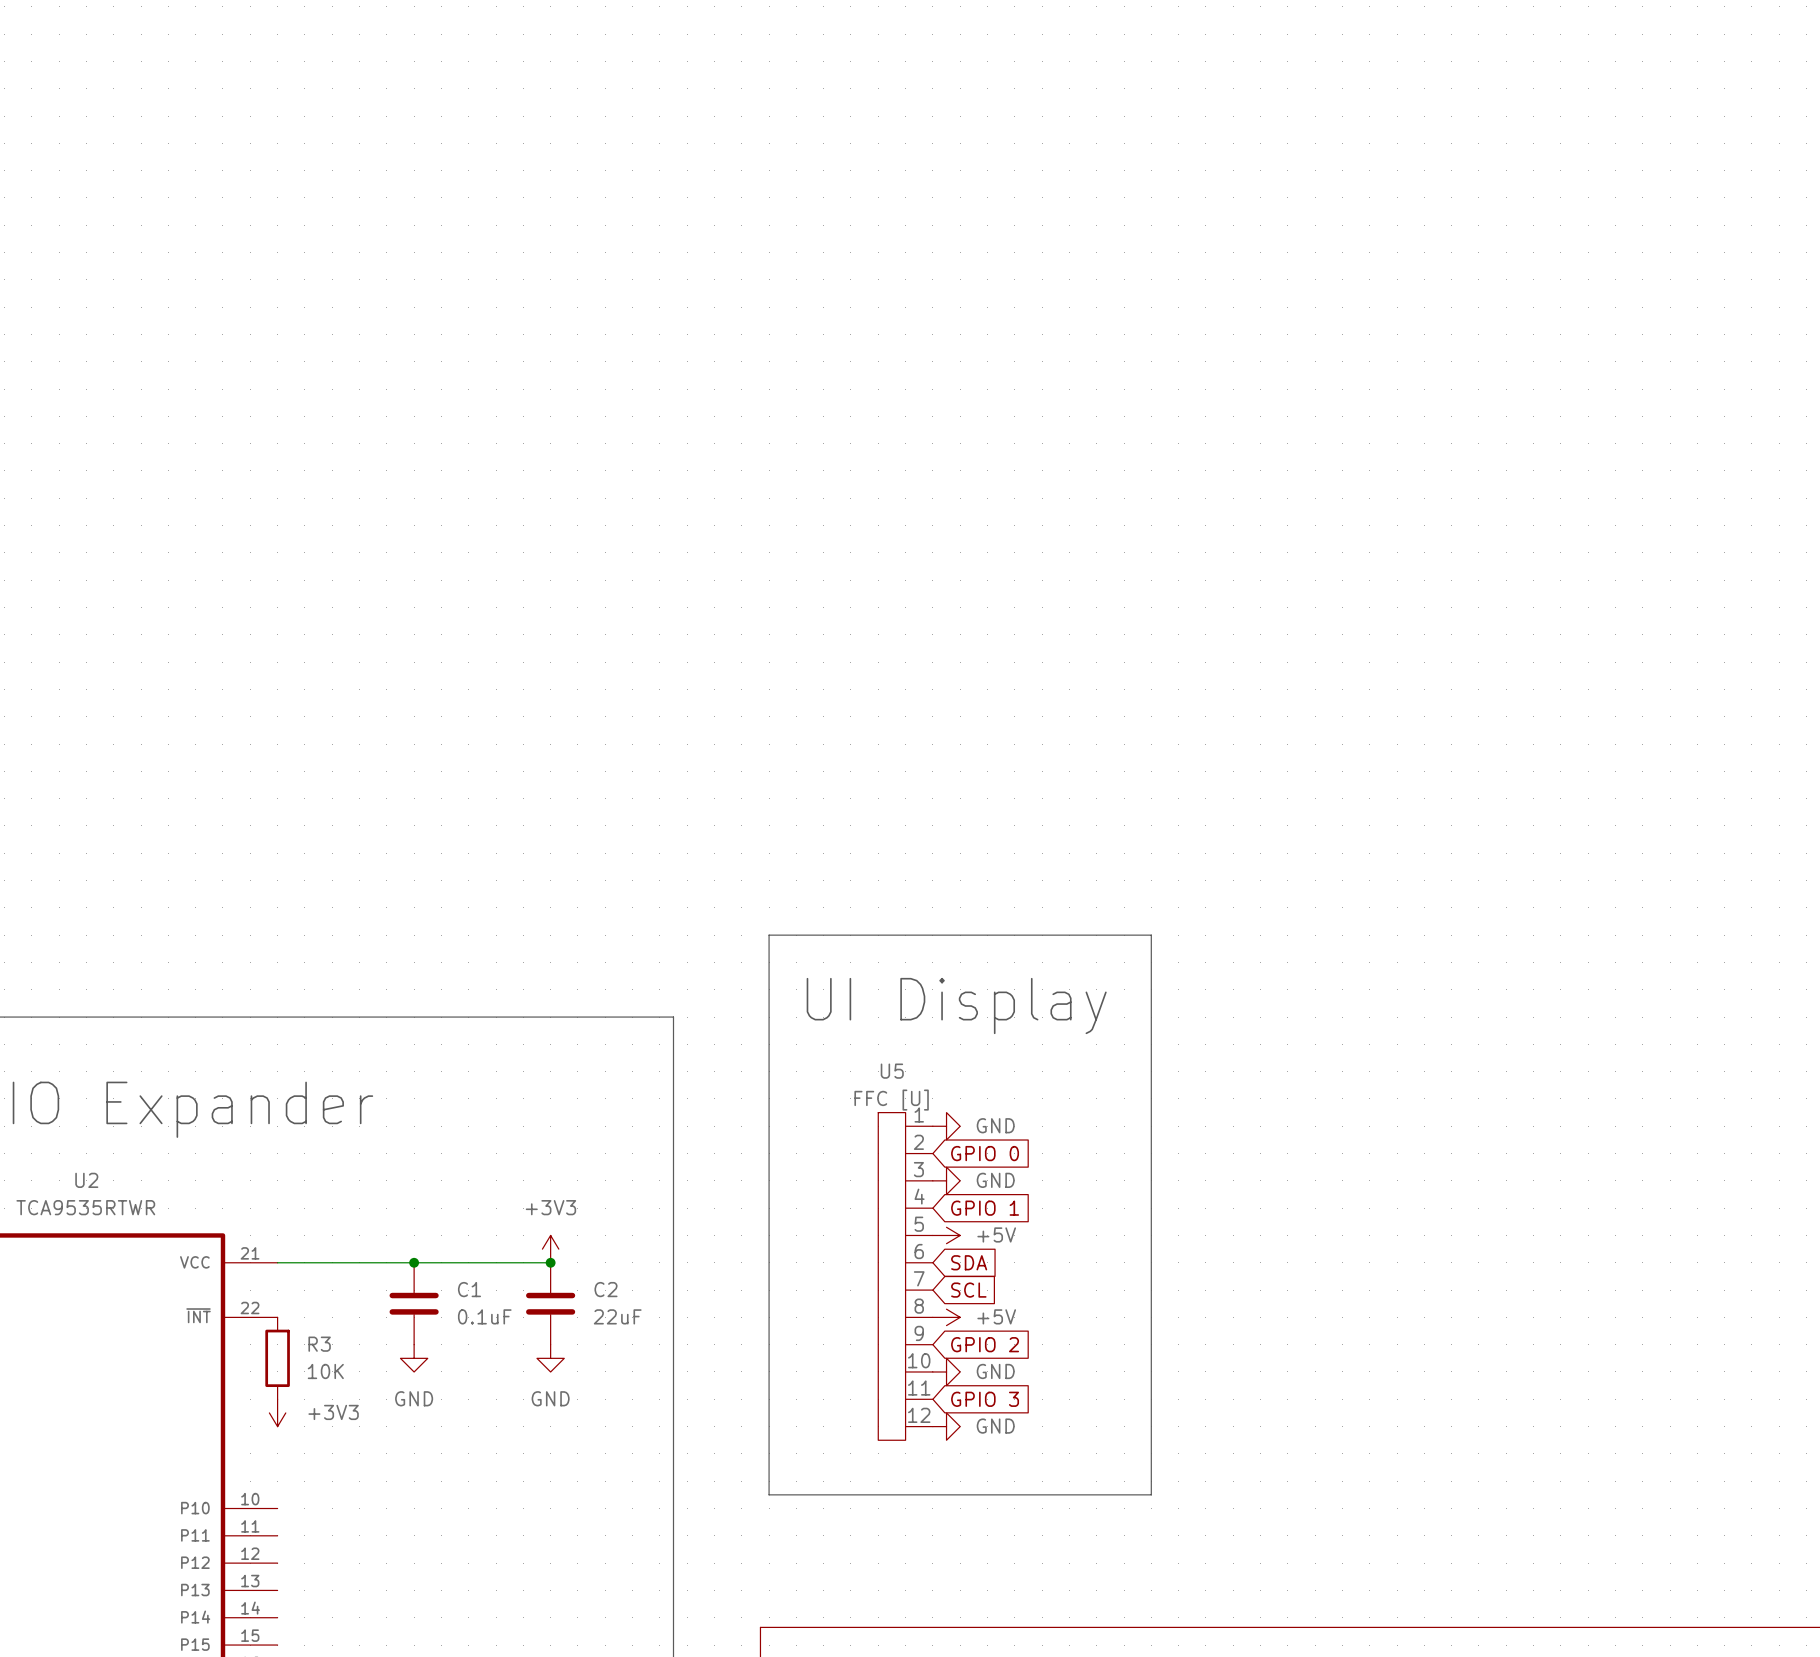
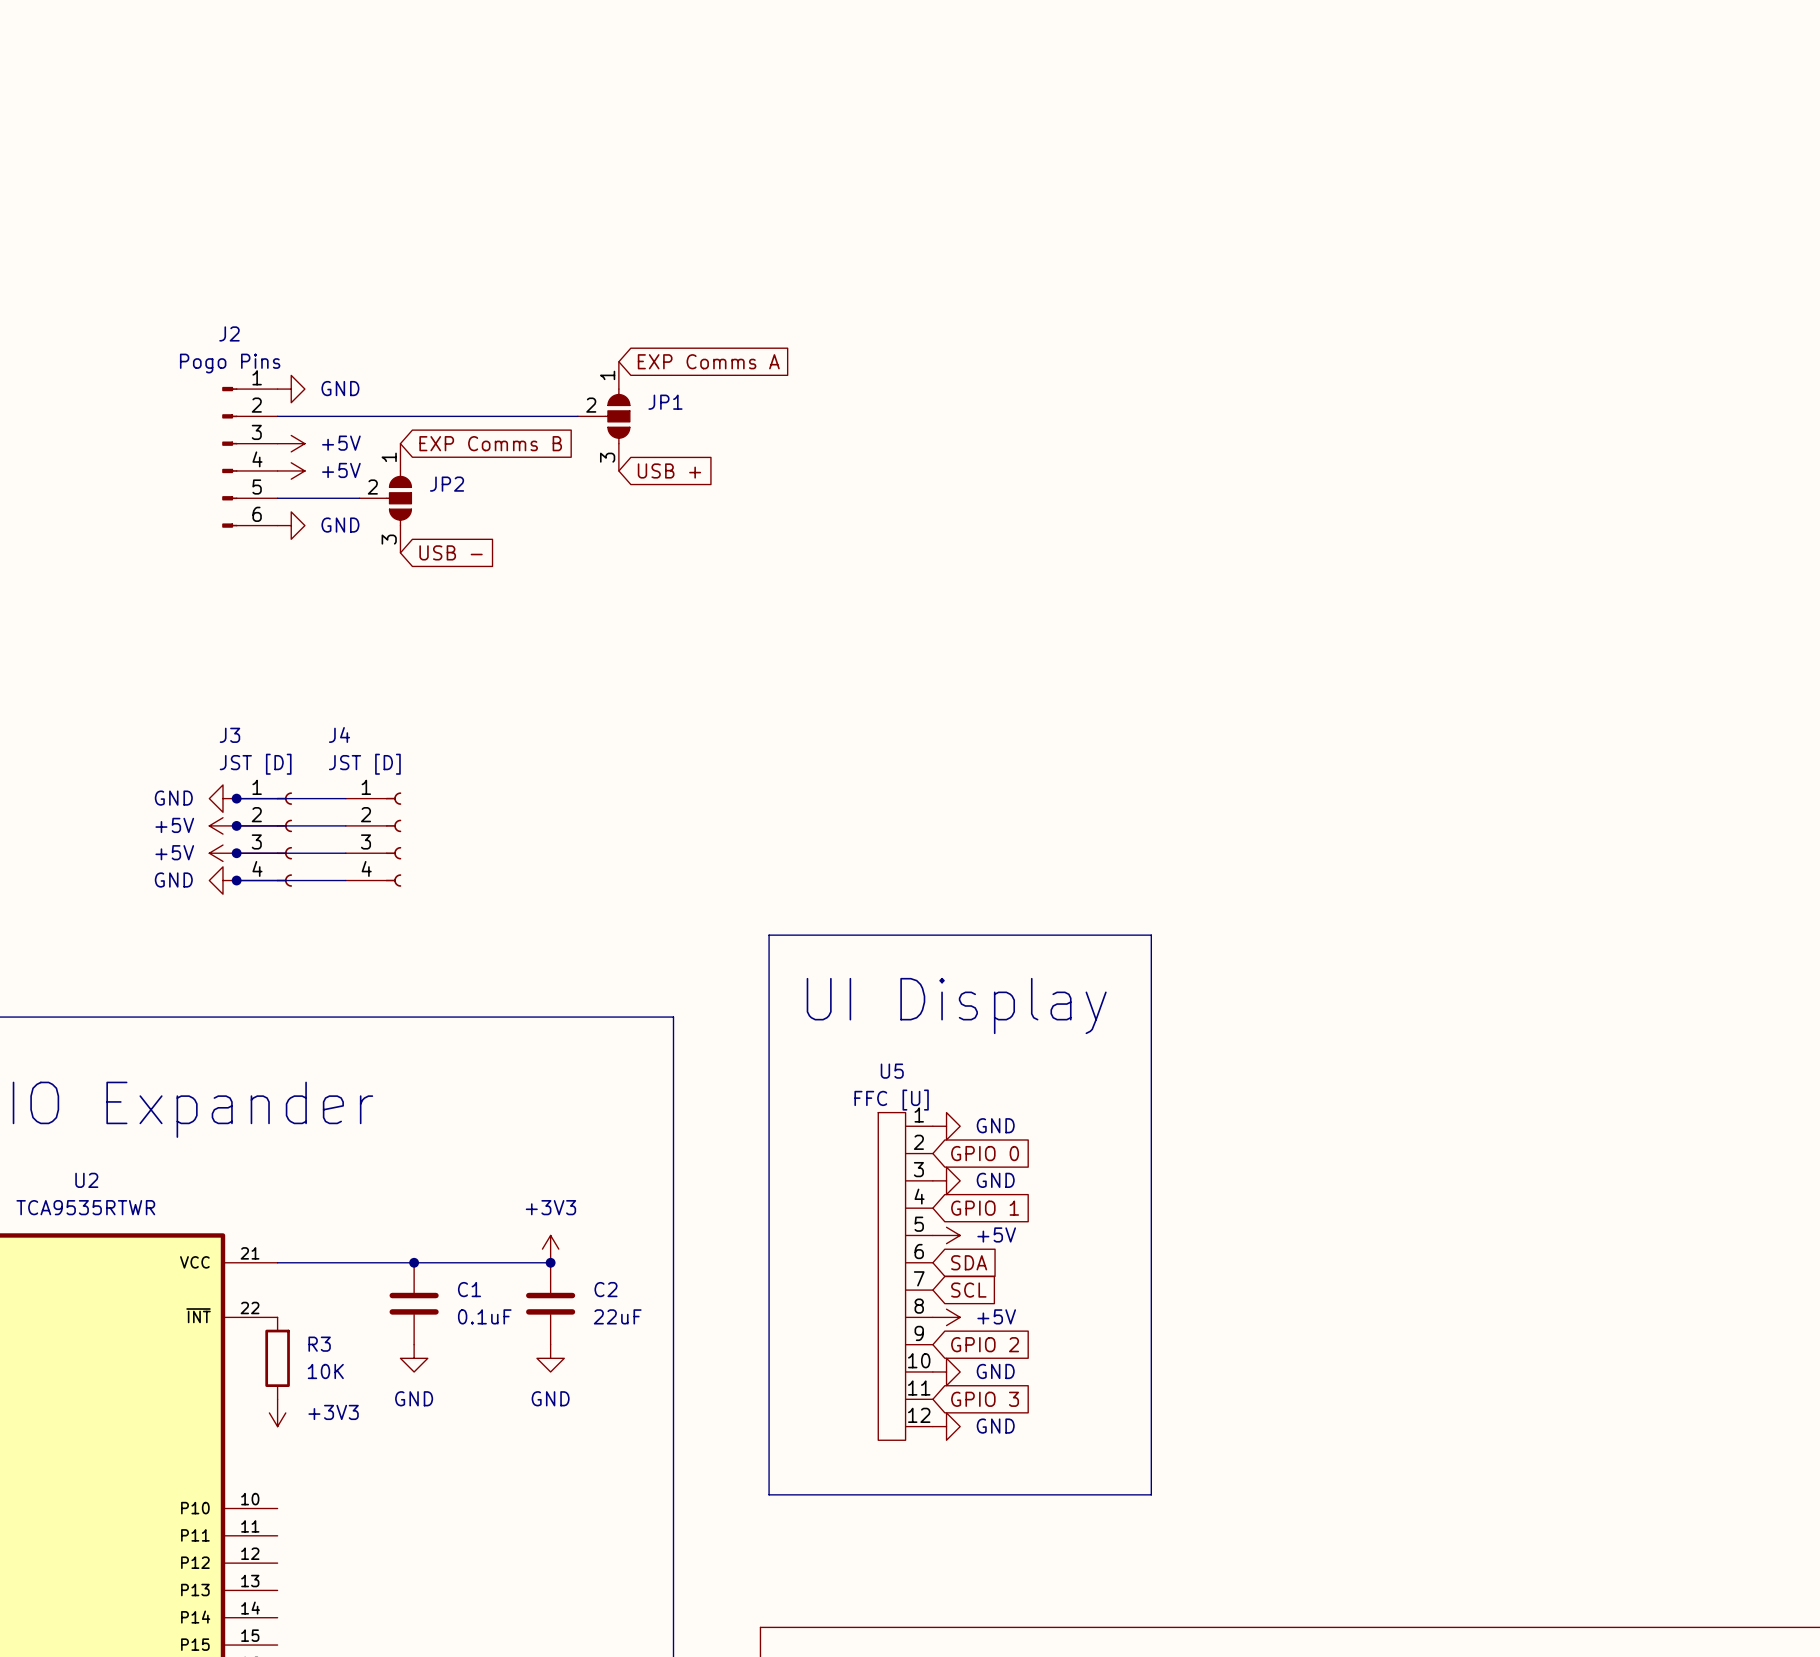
global label: none -> EXP Comms A (708, 361)
power symbol: none -> GND (291, 389)
wire: none -> (277, 416) (577, 416)
JP1: none -> (603, 416)
power symbol: none -> +5V (291, 443)
global label: none -> EXP Comms B (490, 443)
J2: none -> Pogo Pins (249, 457)
power symbol: none -> +5V (291, 470)
global label: none -> USB + (669, 470)
wire: none -> (277, 498) (359, 498)
JP2: none -> (385, 498)
power symbol: none -> GND (291, 525)
global label: none -> USB - (451, 552)
power symbol: none -> GND (222, 798)
wire: none -> (236, 798) (345, 798)
junction: none -> (236, 798)
power symbol: none -> +5V (222, 825)
wire: none -> (236, 825) (345, 825)
junction: none -> (236, 825)
J3: none -> JST [D] (264, 839)
J4: none -> JST [D] (373, 839)
power symbol: none -> +5V (222, 853)
wire: none -> (236, 853) (345, 853)
junction: none -> (236, 853)
power symbol: none -> GND (222, 880)
wire: none -> (236, 880) (345, 880)
junction: none -> (236, 880)

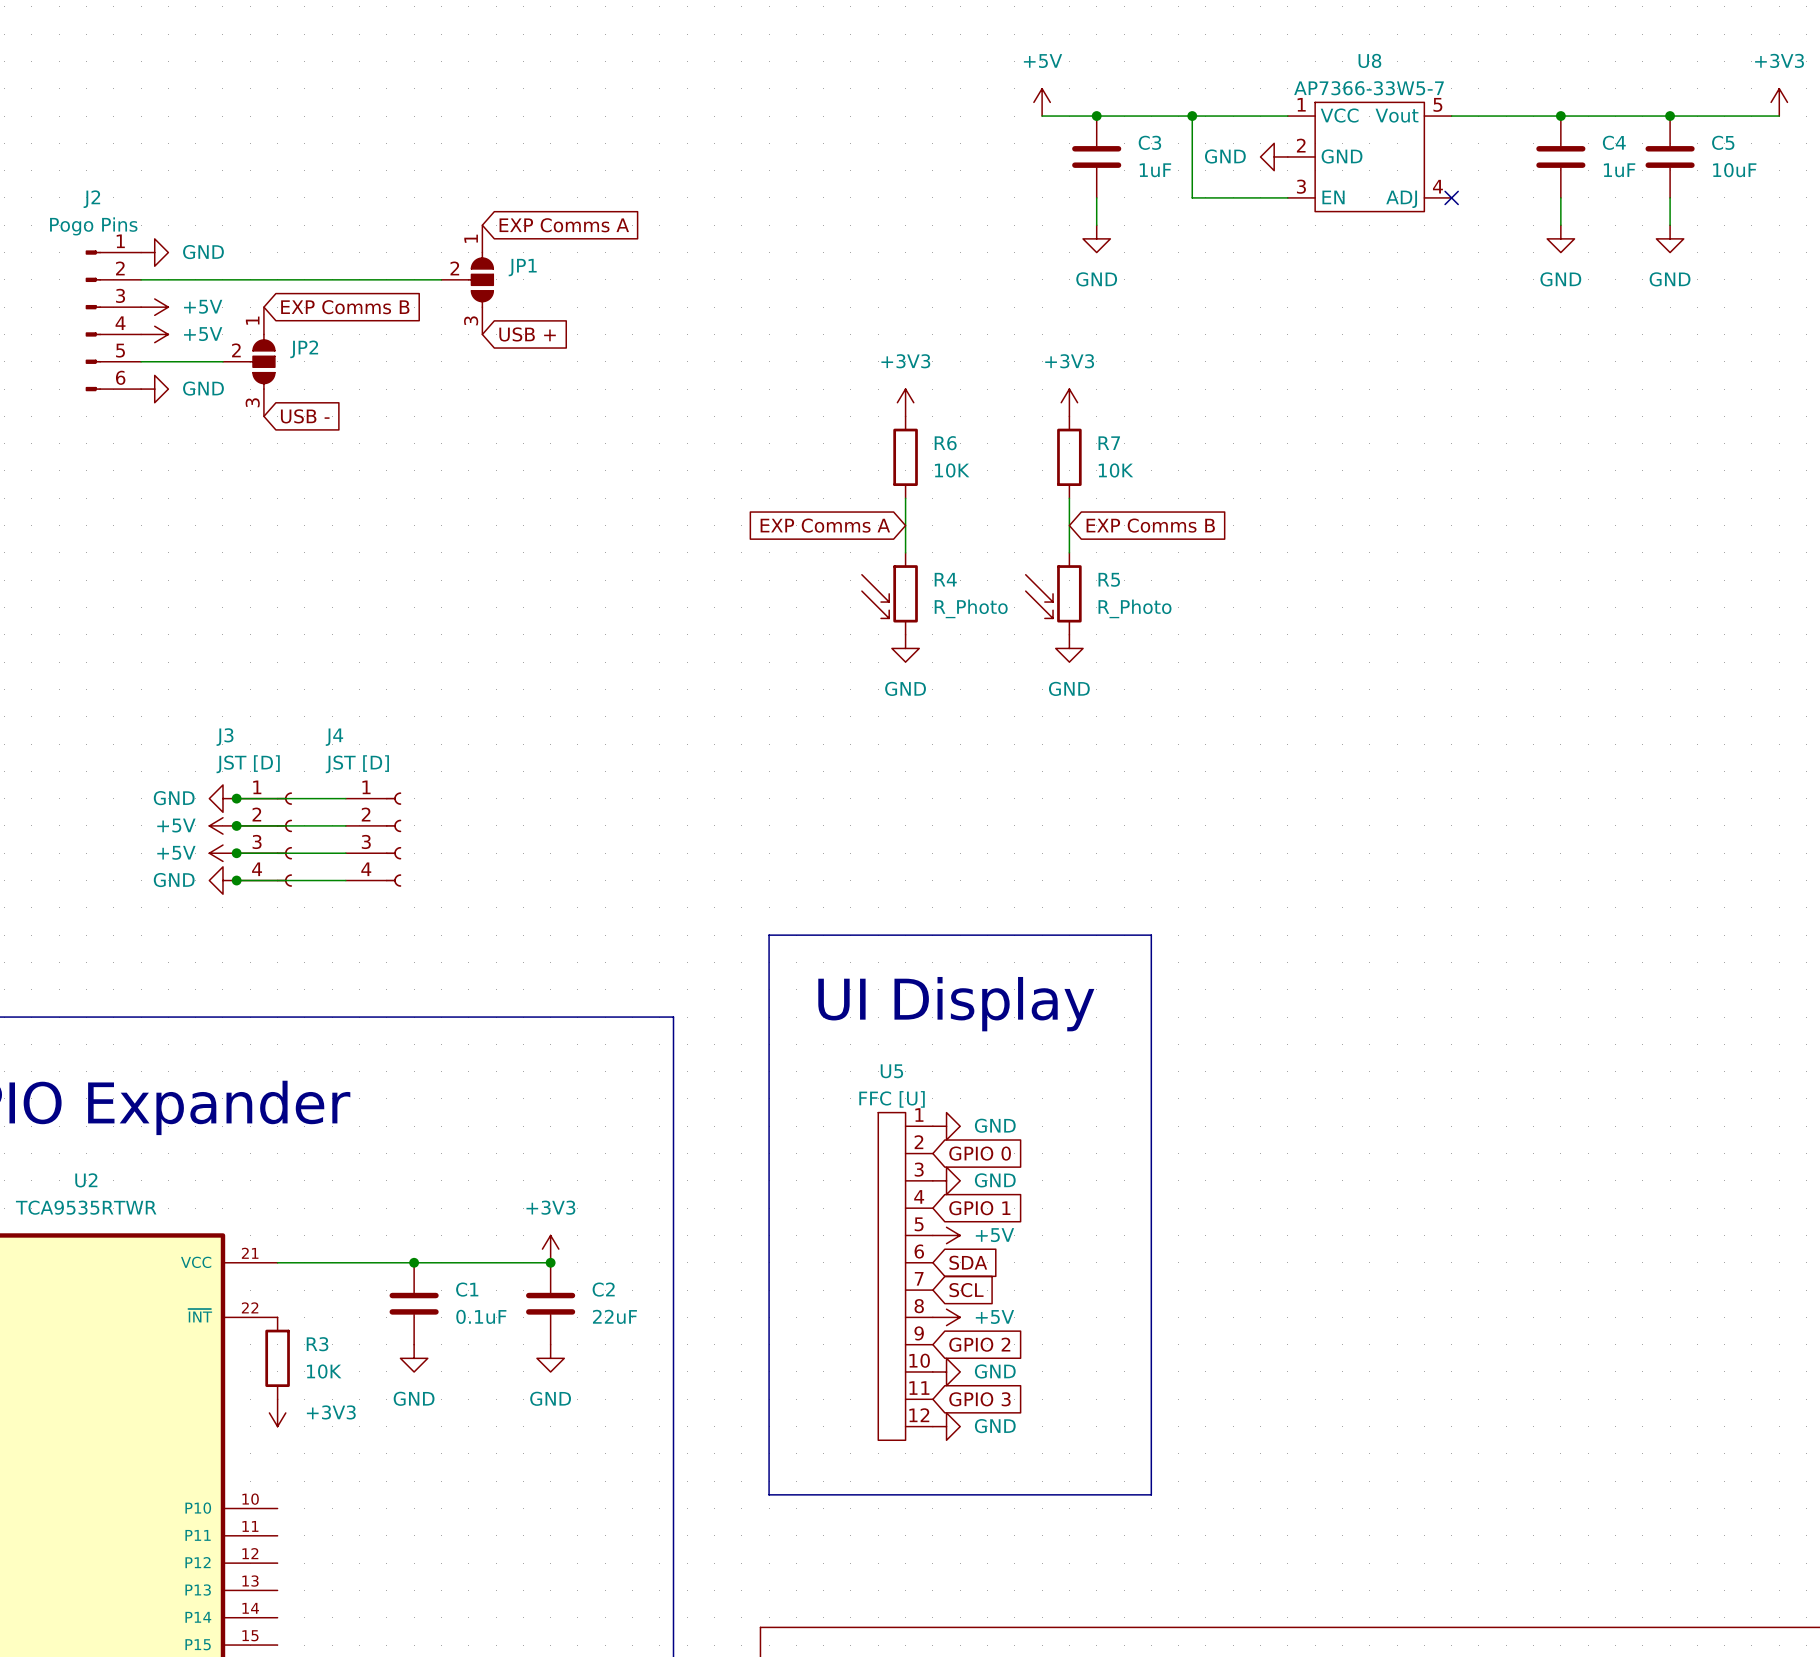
power symbol: none -> +5V (1042, 102)
power symbol: none -> +3V3 (1779, 102)
wire: none -> (1042, 116) (1287, 116)
junction: none -> (1096, 116)
wire: none -> (1192, 116) (1192, 197) (1287, 197)
junction: none -> (1192, 116)
wire: none -> (1451, 116) (1779, 116)
junction: none -> (1560, 116)
junction: none -> (1670, 116)
C3: none -> 1uF (1096, 156)
power symbol: none -> GND (1274, 156)
U8: none -> AP7366-33W5-7 (1369, 156)
C4: none -> 1uF (1560, 156)
C5: none -> 10uF (1670, 156)
wire: none -> (1096, 197) (1096, 225)
no-connect mark: none -> (1451, 197)
wire: none -> (1560, 197) (1560, 225)
wire: none -> (1670, 197) (1670, 225)
global label: none -> EXP Comms A (564, 225)
power symbol: none -> GND (1096, 238)
power symbol: none -> GND (1560, 238)
power symbol: none -> GND (1670, 238)
power symbol: none -> GND (154, 252)
power symbol: none -> +5V (154, 307)
power symbol: none -> +5V (154, 334)
global label: EXP Comms A (708, 361) -> none
power symbol: none -> GND (154, 389)
power symbol: GND (291, 389) -> none
power symbol: none -> +3V3 (905, 402)
power symbol: none -> +3V3 (1069, 402)
wire: (277, 416) (577, 416) -> (141, 279) (441, 279)
JP1 position: (603, 416) -> (467, 279)
power symbol: +5V (291, 443) -> none
global label position: EXP Comms B (490, 443) -> EXP Comms B (345, 307)
J2 position: (249, 457) -> (113, 320)
R6: none -> 10K (905, 457)
R7: none -> 10K (1069, 457)
power symbol: +5V (291, 470) -> none
global label position: USB + (669, 470) -> USB + (527, 334)
wire: (277, 498) (359, 498) -> (141, 361) (222, 361)
JP2 position: (385, 498) -> (248, 361)
wire: none -> (905, 498) (905, 552)
wire: none -> (1069, 498) (1069, 552)
power symbol: GND (291, 525) -> none
global label: none -> EXP Comms A (825, 525)
global label: none -> EXP Comms B (1150, 525)
global label position: USB - (451, 552) -> USB - (305, 416)
R4: none -> R_Photo (889, 593)
R5: none -> R_Photo (1053, 593)
power symbol: none -> GND (905, 648)
power symbol: none -> GND (1069, 648)

